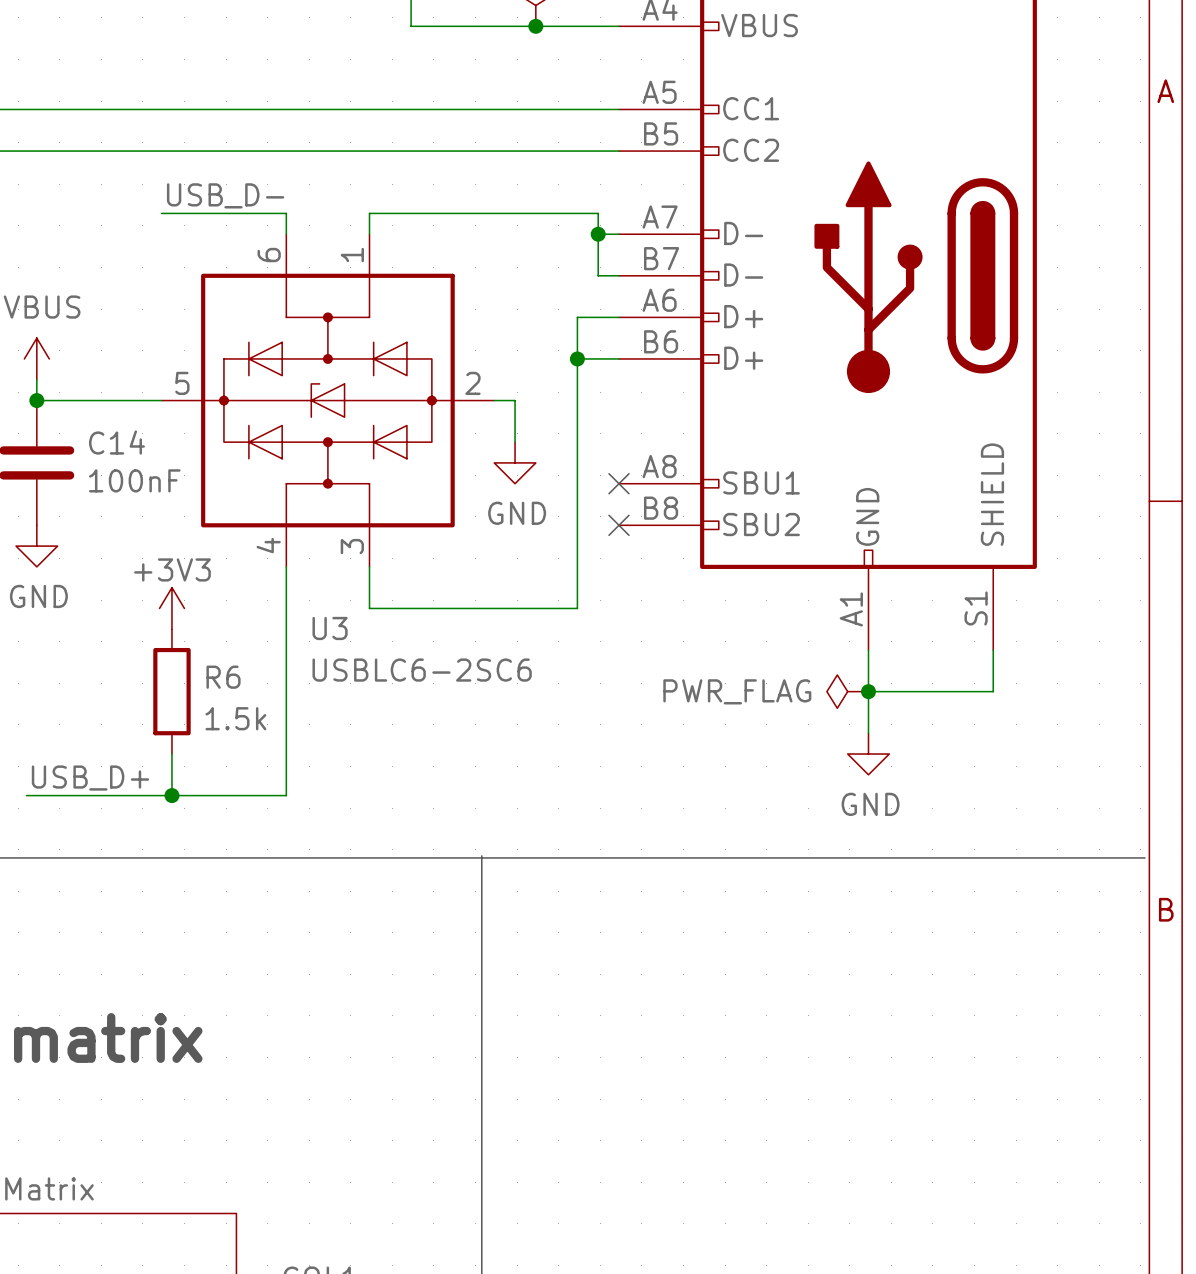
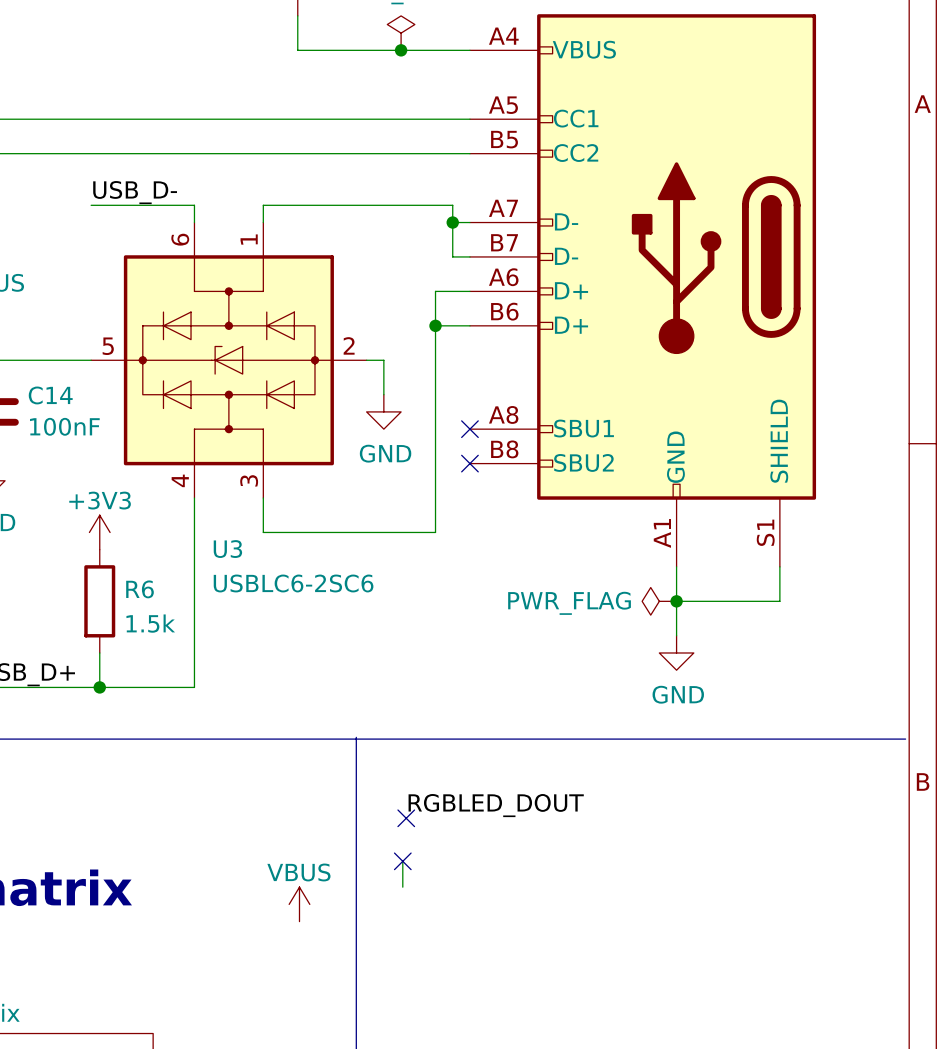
label: none -> RGBLED_DOUT (496, 805)
no-connect mark: none -> (406, 818)
wire: none -> (402, 861) (402, 887)
no-connect mark: none -> (402, 861)
power symbol: none -> VBUS (299, 904)

